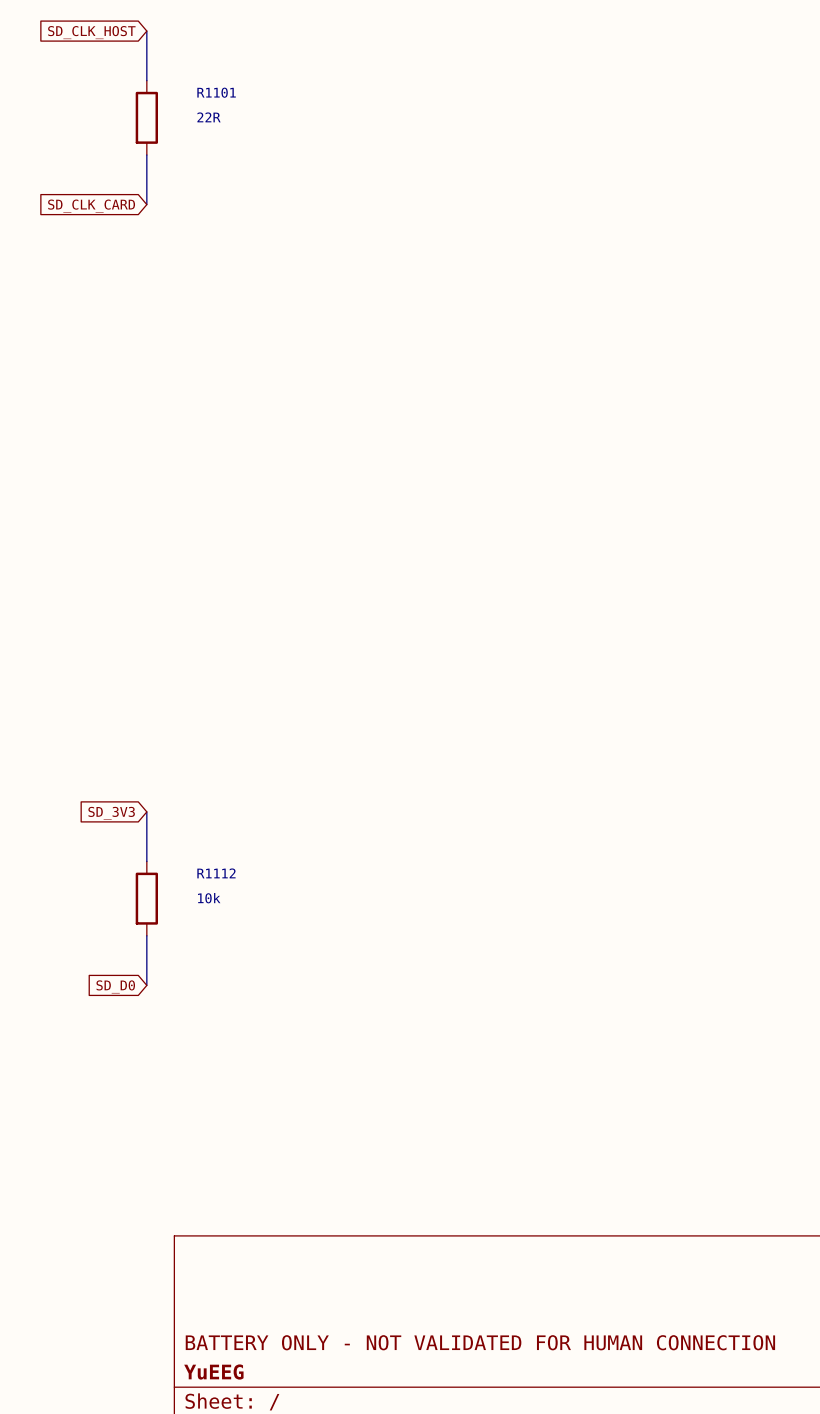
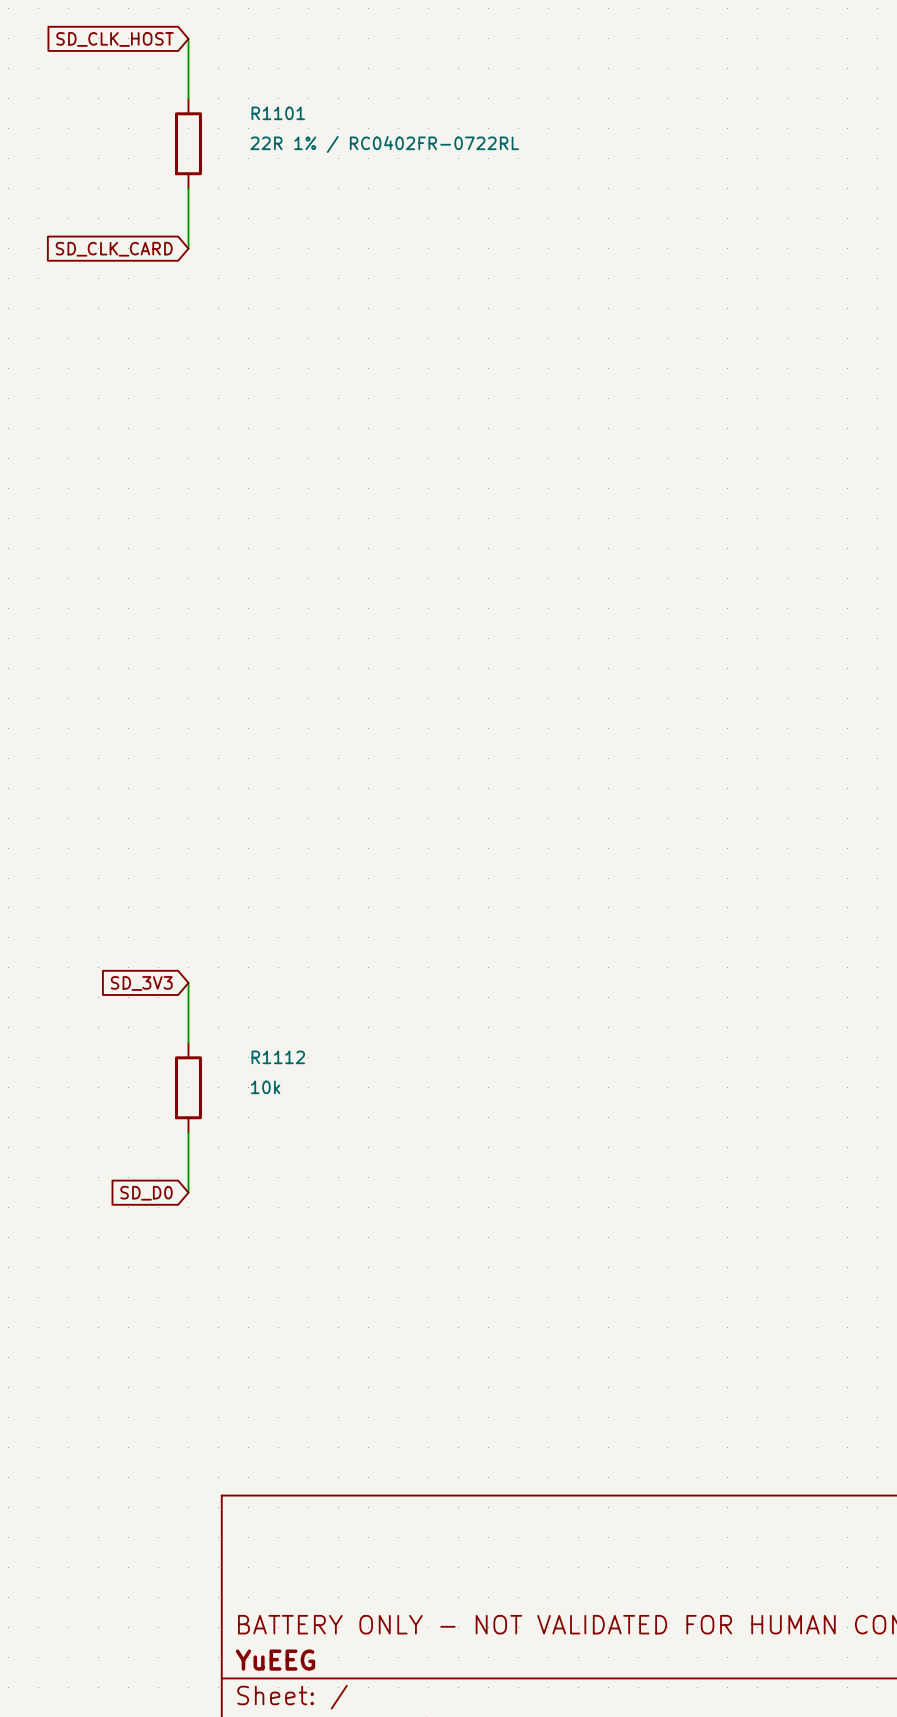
R1101 value: 22R (209, 117) -> 22R 1% / RC0402FR-0722RL (384, 144)

